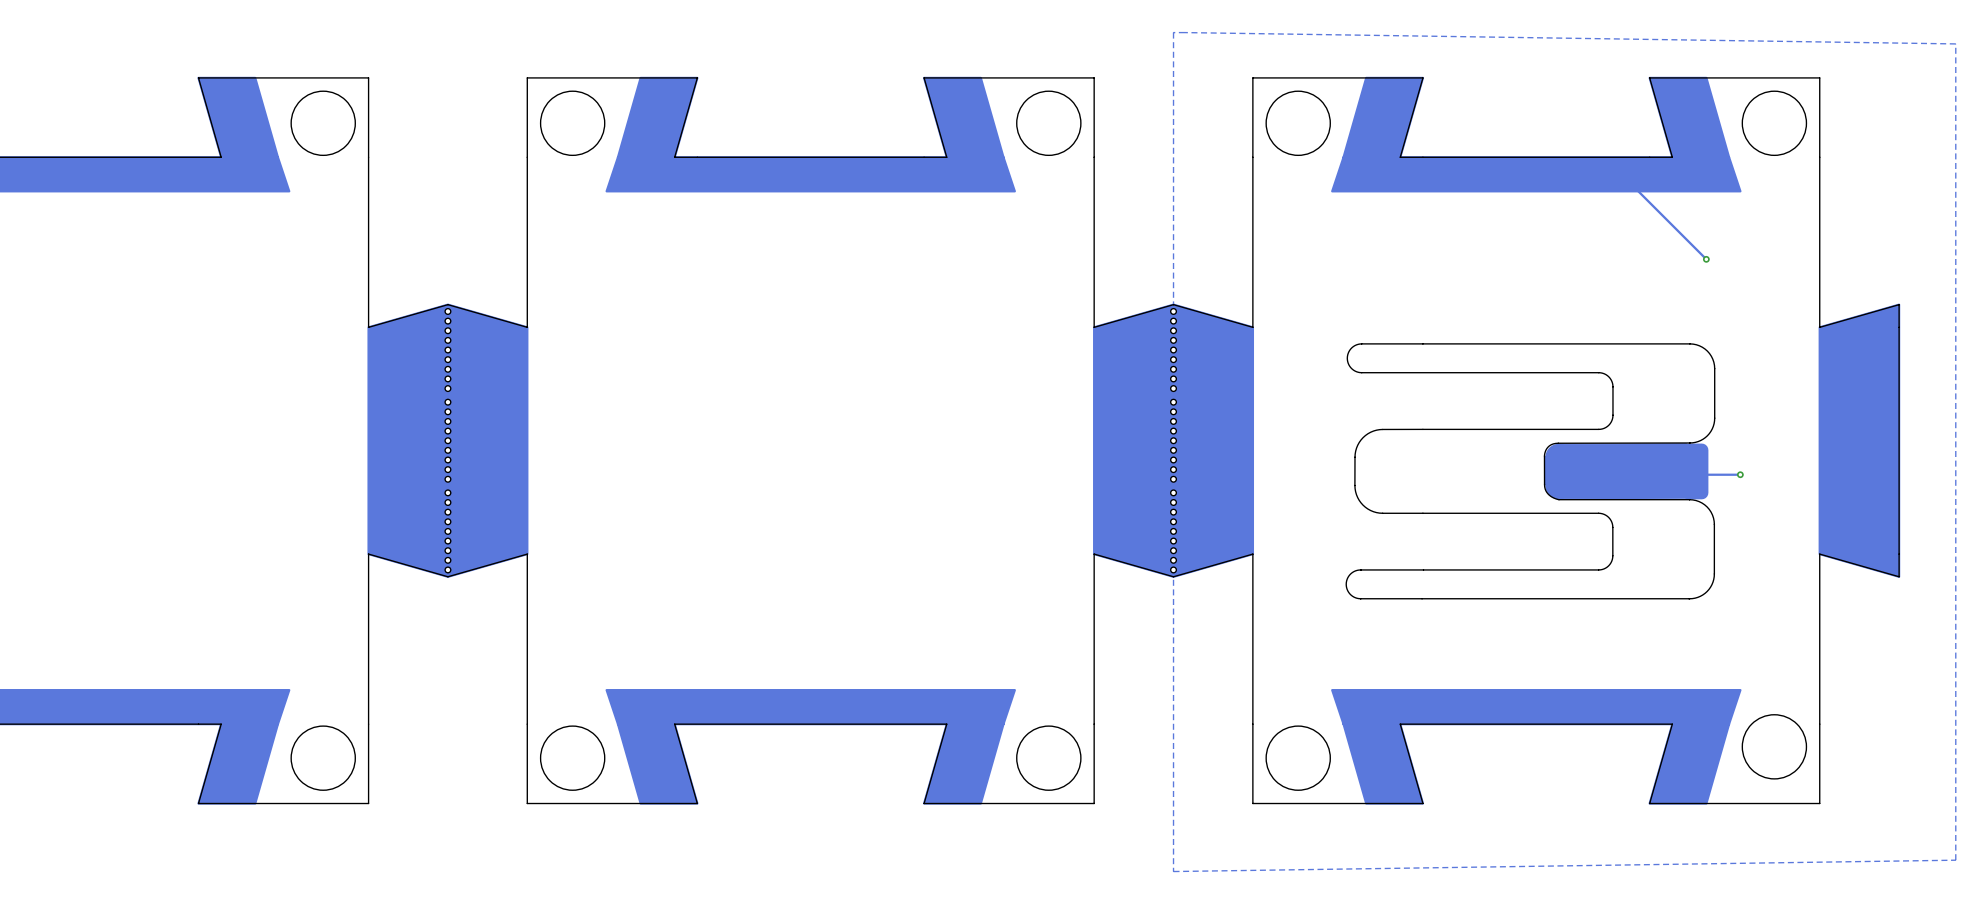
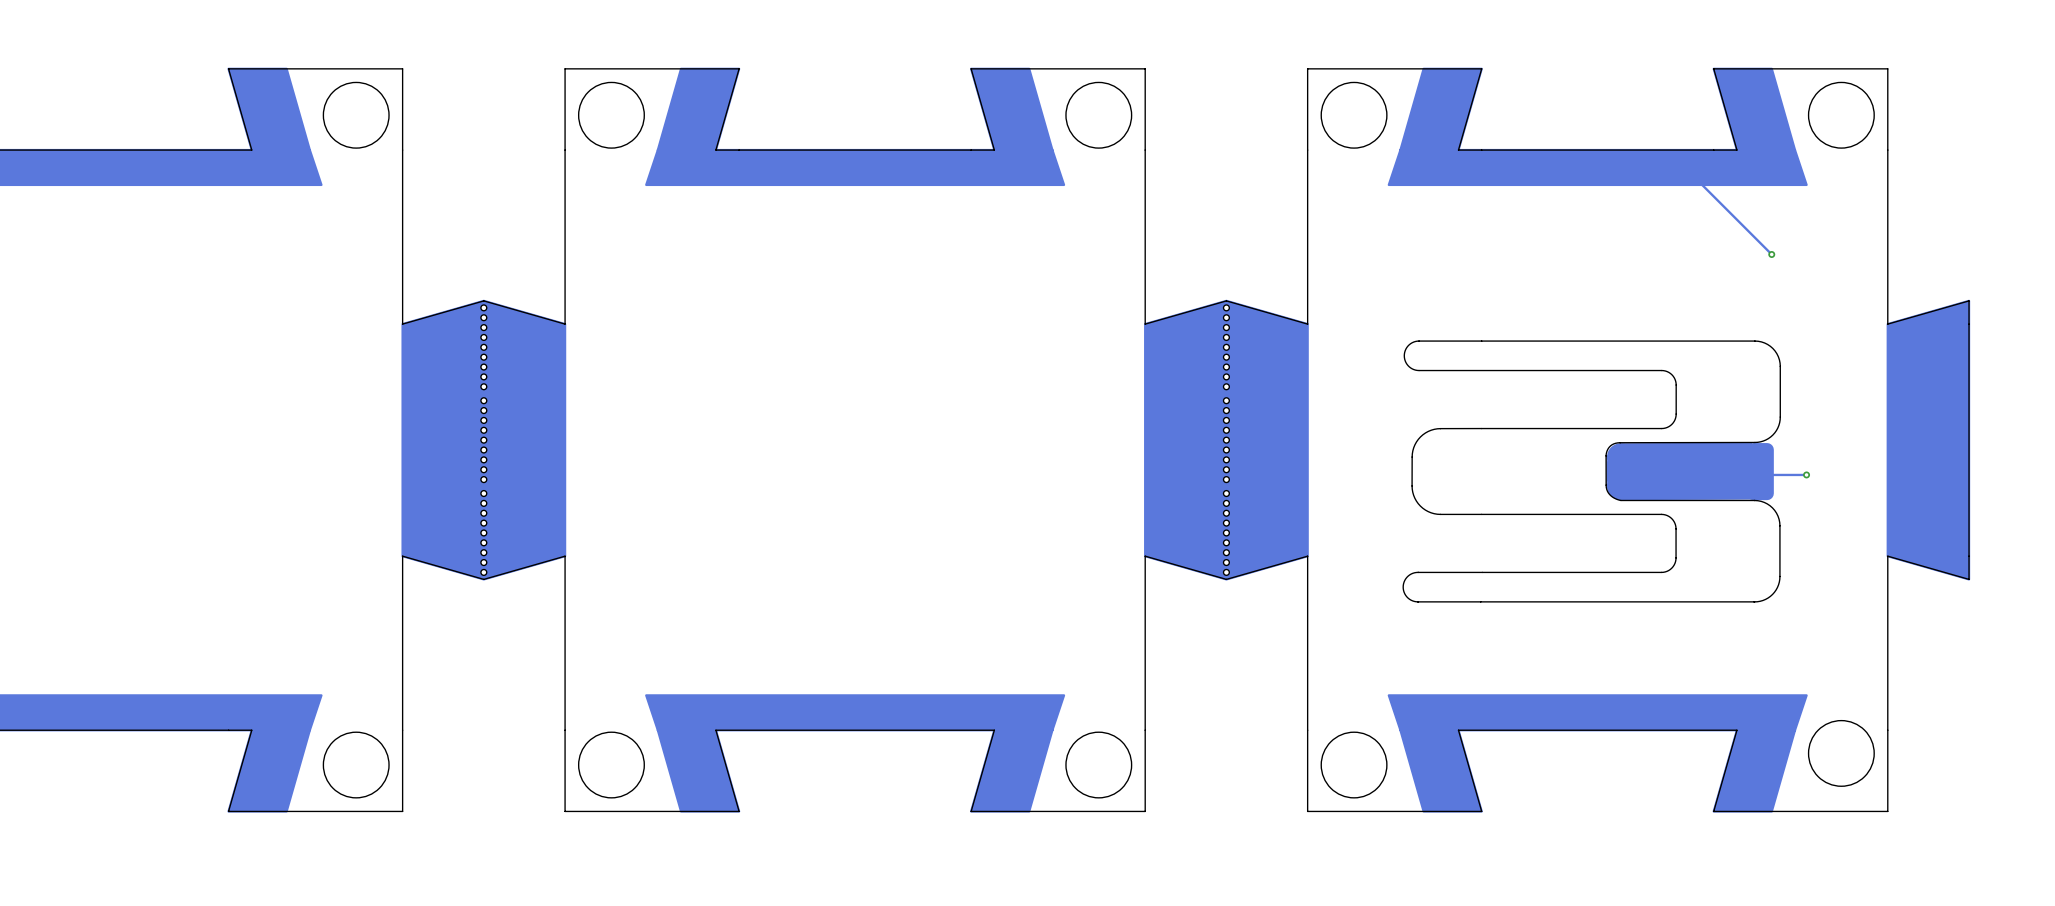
zone outline: (1184, 32) (1955, 43) (1955, 860) (1173, 871) (1173, 32) (1184, 32) -> none

